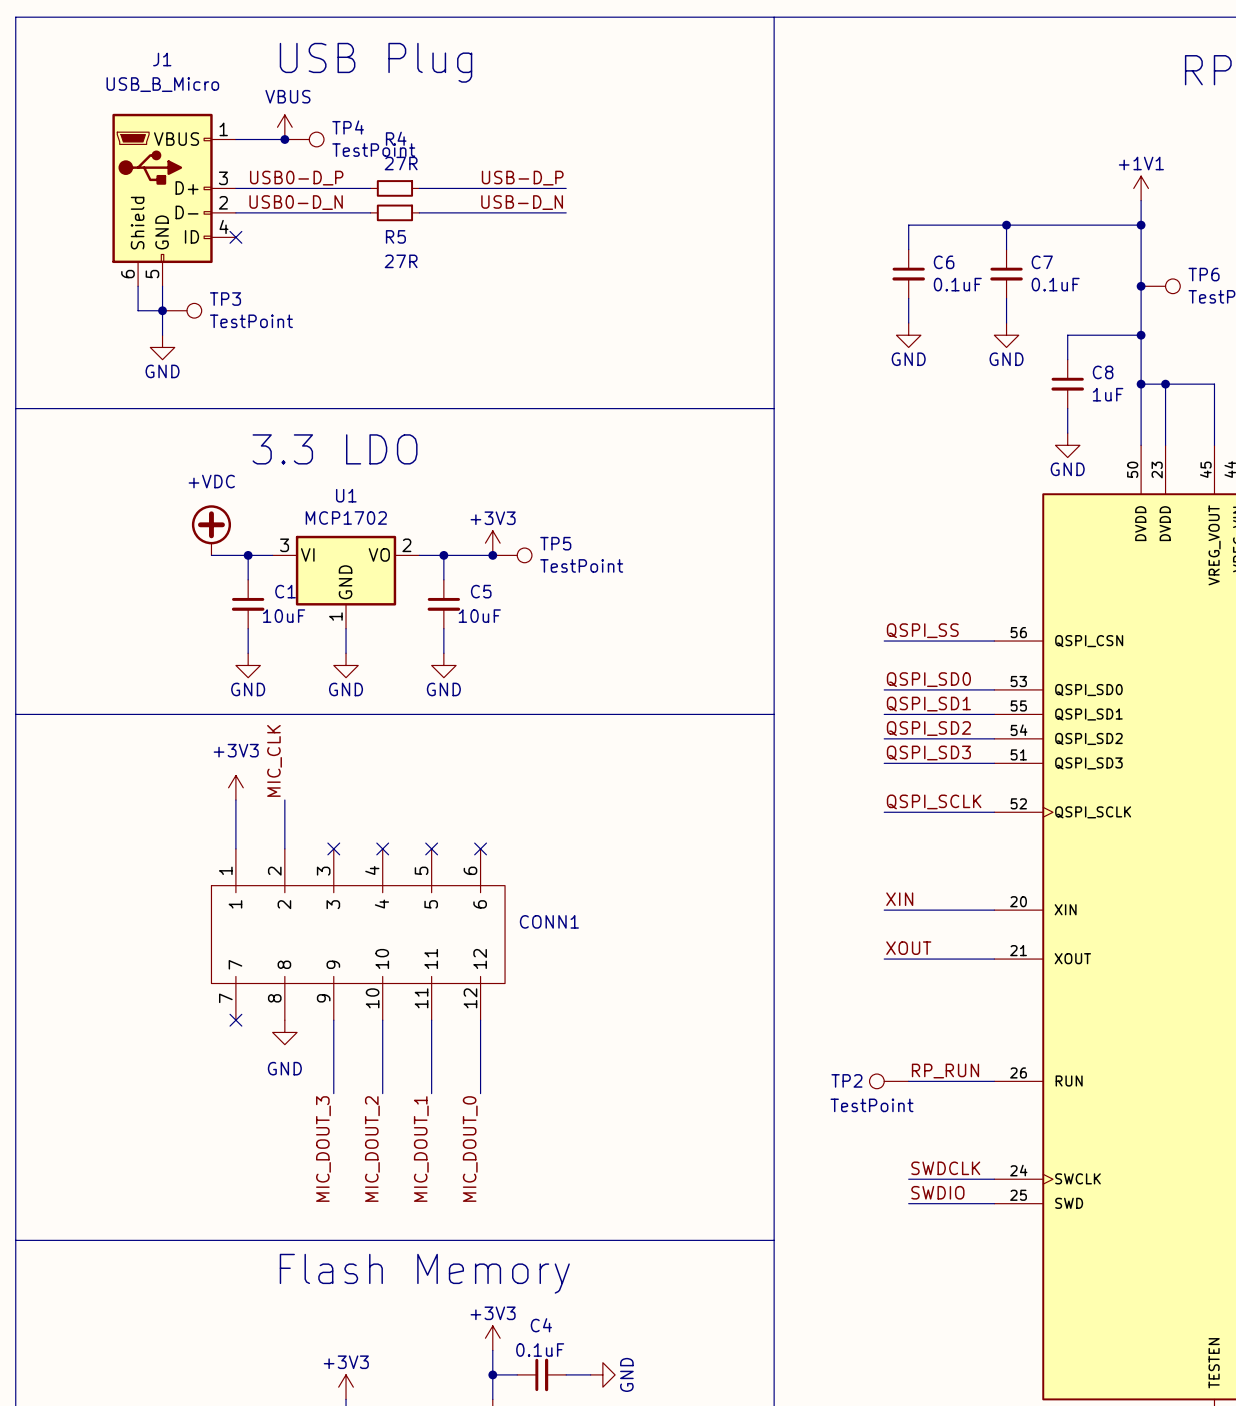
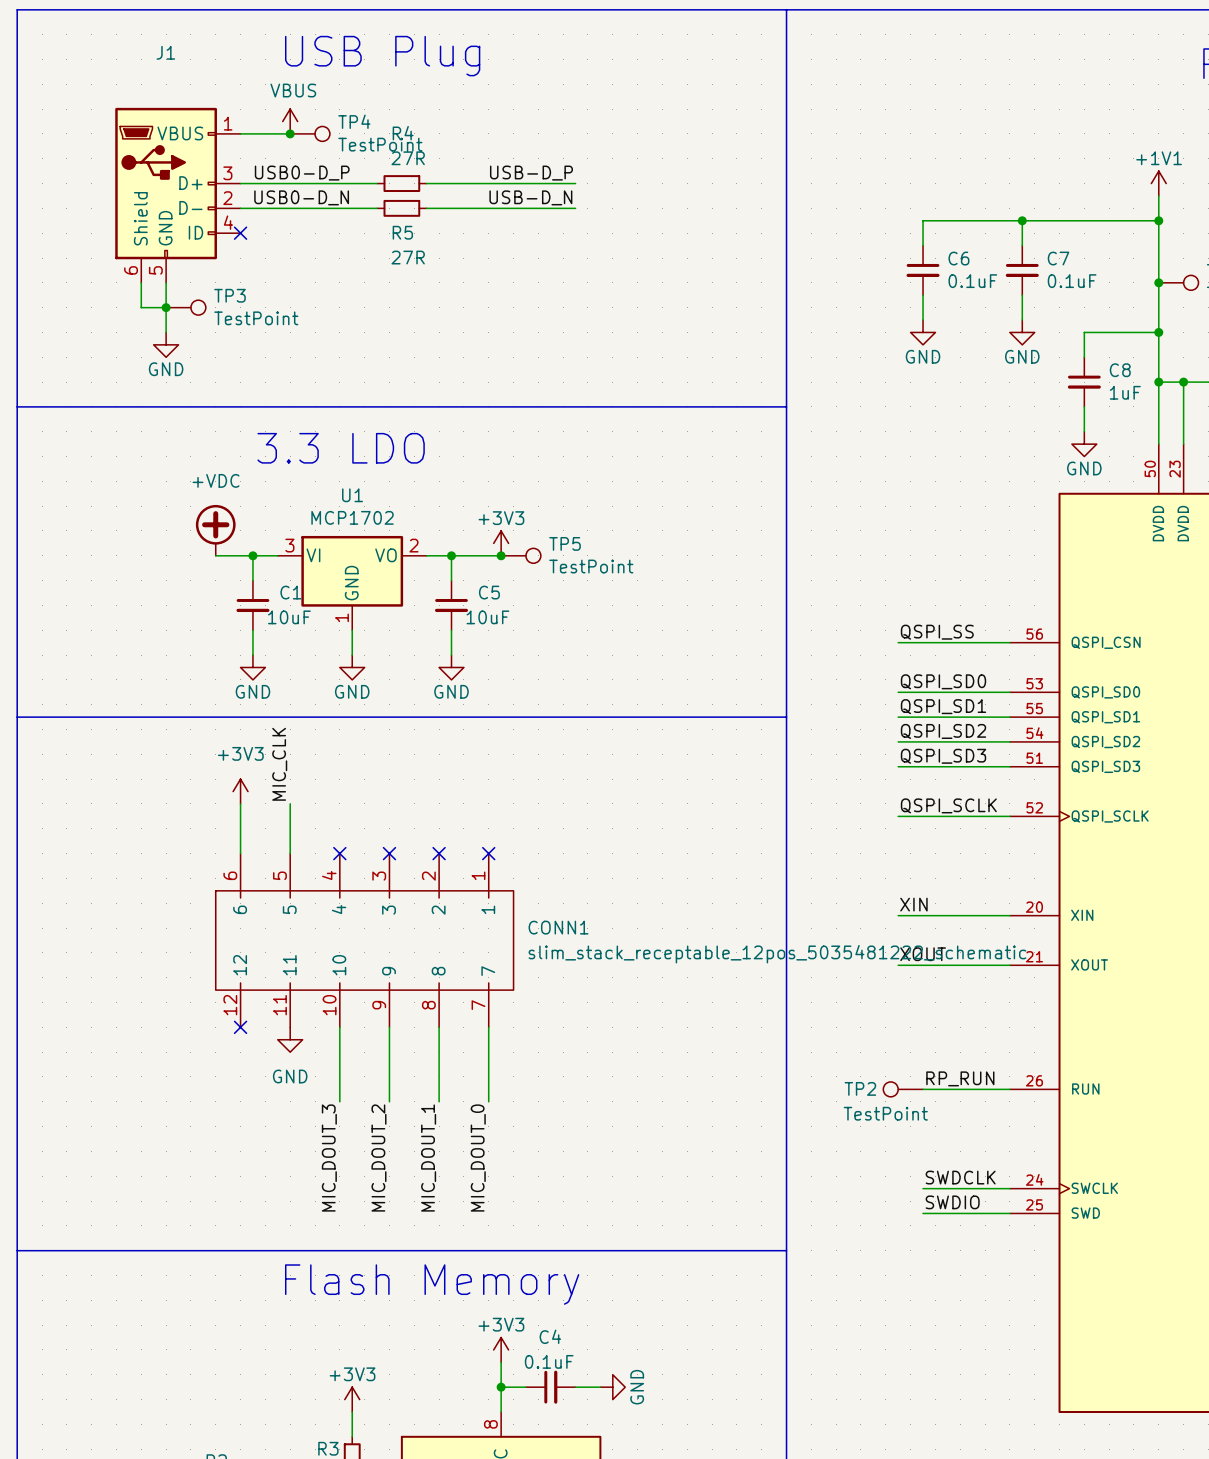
J1 value: USB_B_Micro (162, 84) -> none
CONN1 flip: as is (358, 934) -> left-right (364, 940)
CONN1 value: none -> slim_stack_receptable_12pos_5035481222_schematic (777, 954)

